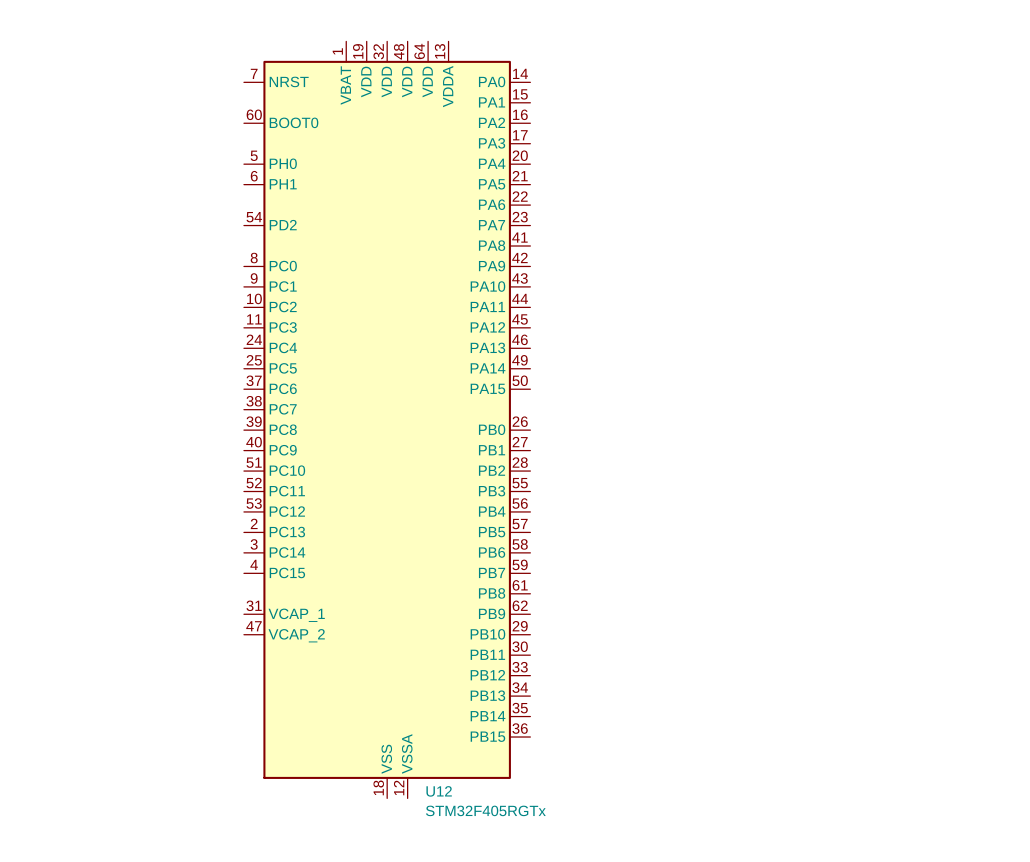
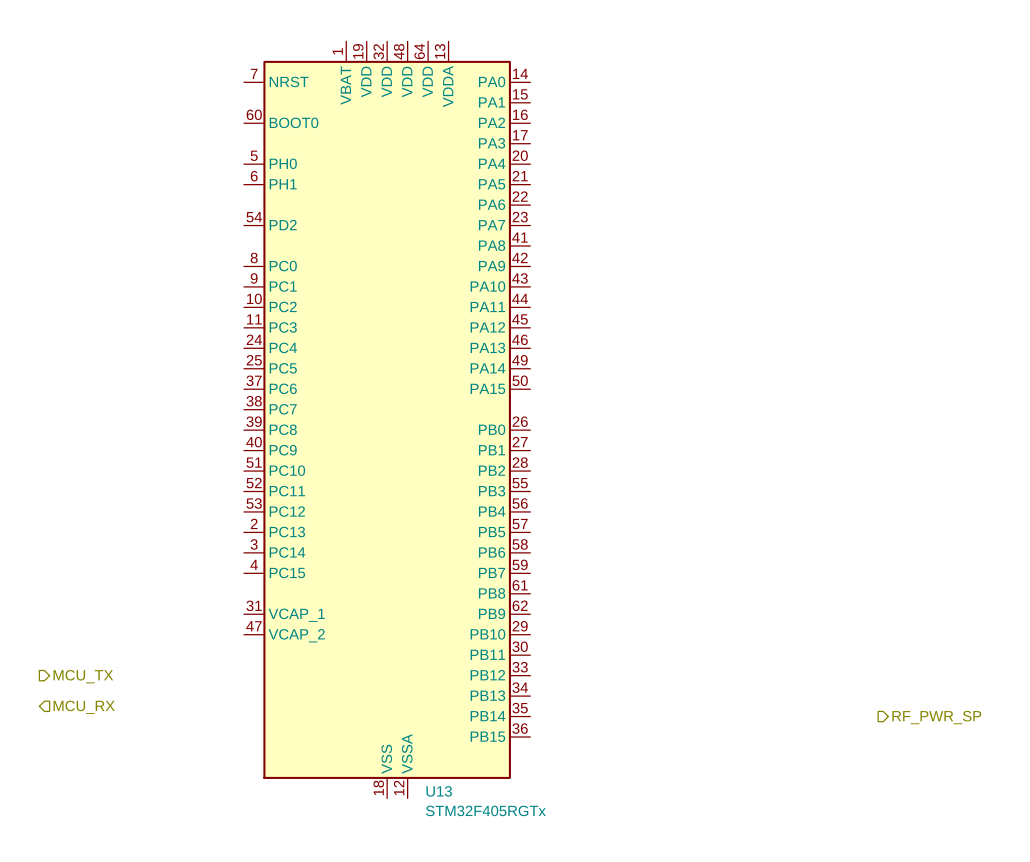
hierarchical label: none -> MCU_TX (83, 676)
hierarchical label: none -> MCU_RX (84, 707)
hierarchical label: none -> RF_PWR_SP (936, 717)
U12 name: U12 (439, 791) -> U13 (439, 791)

